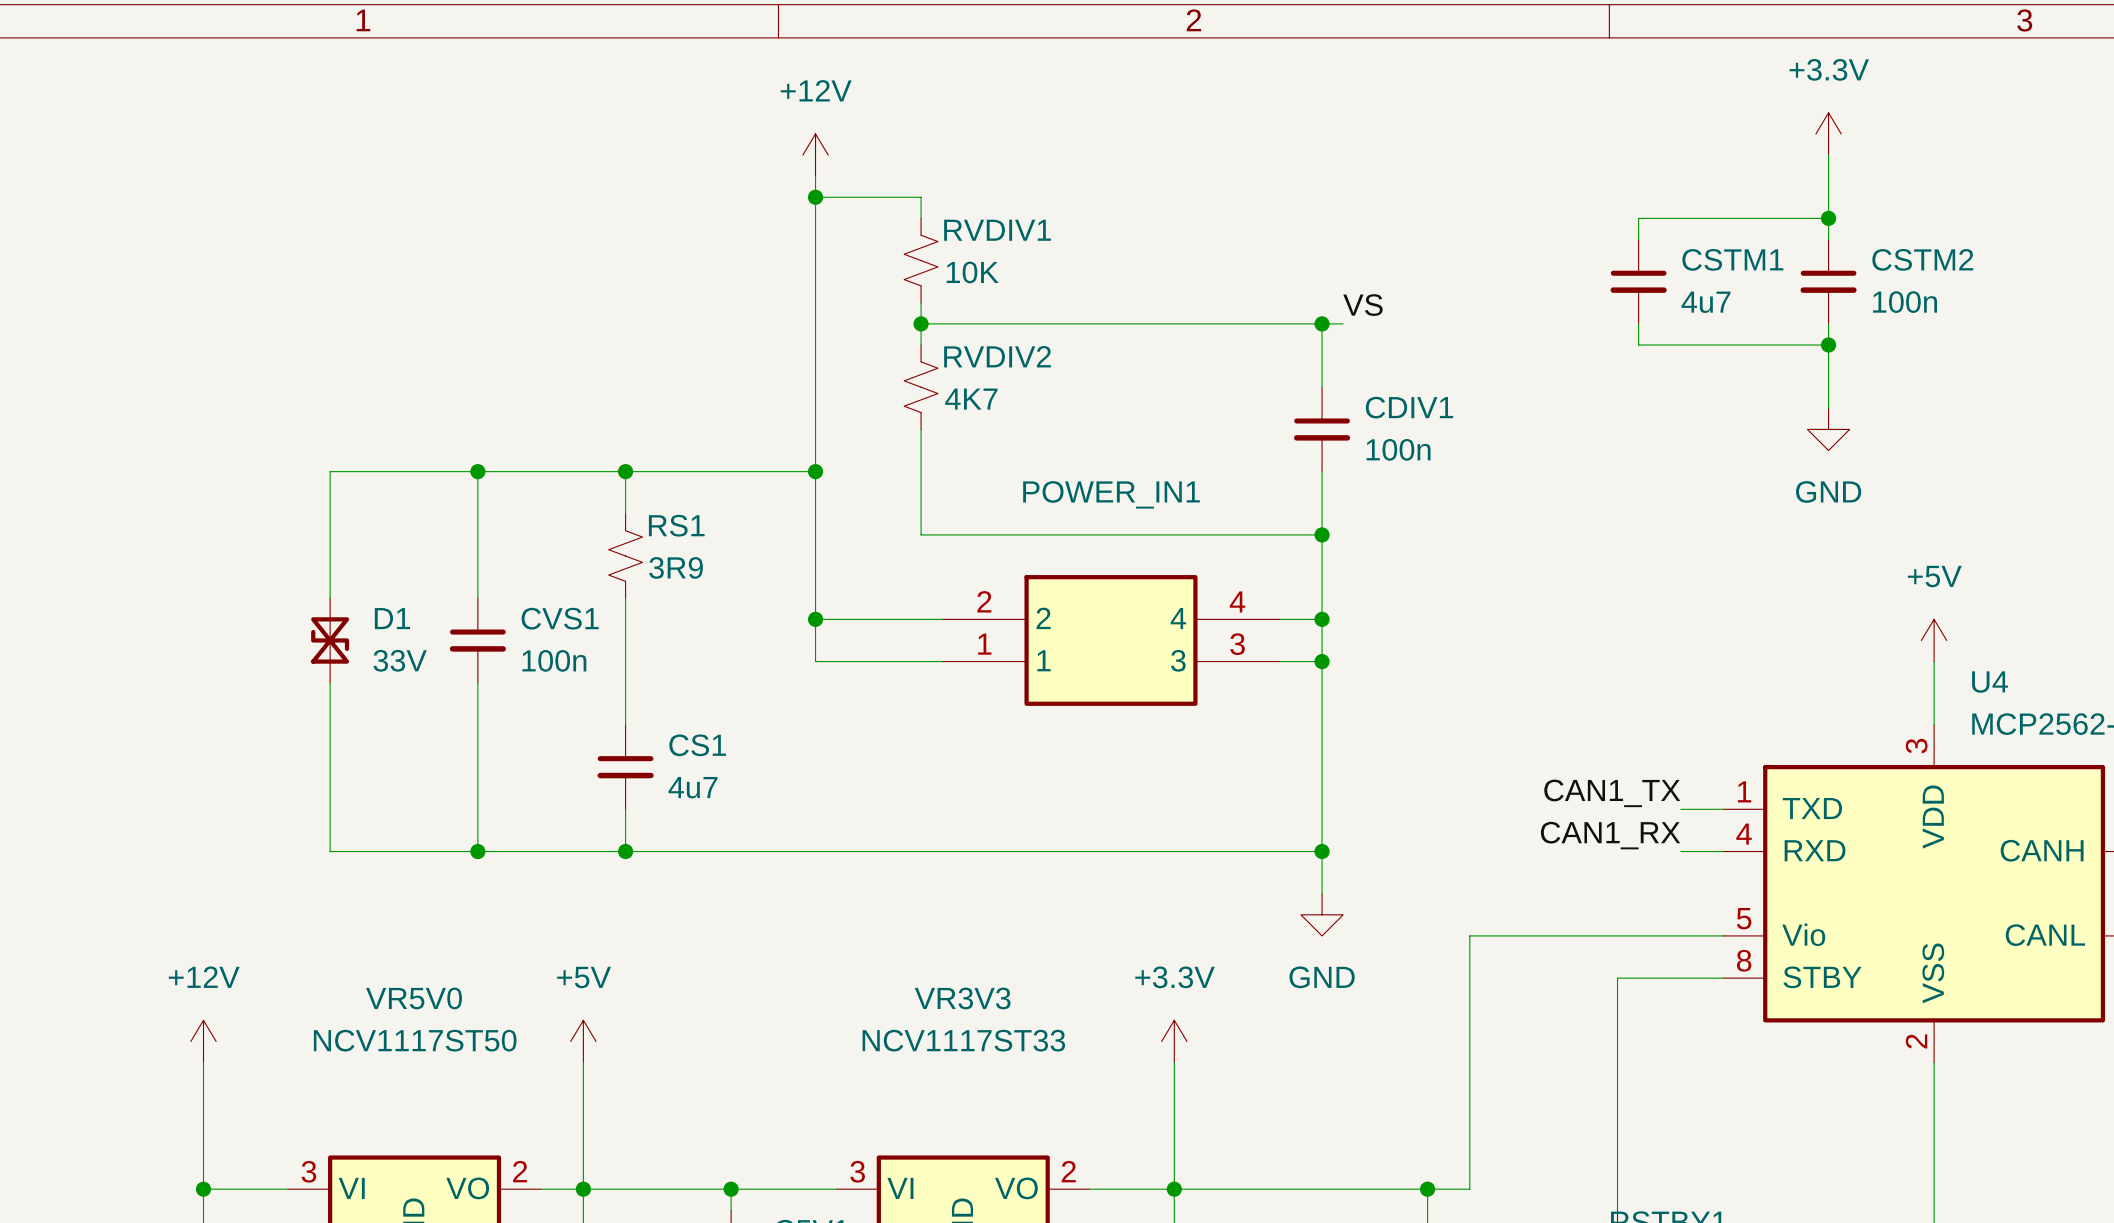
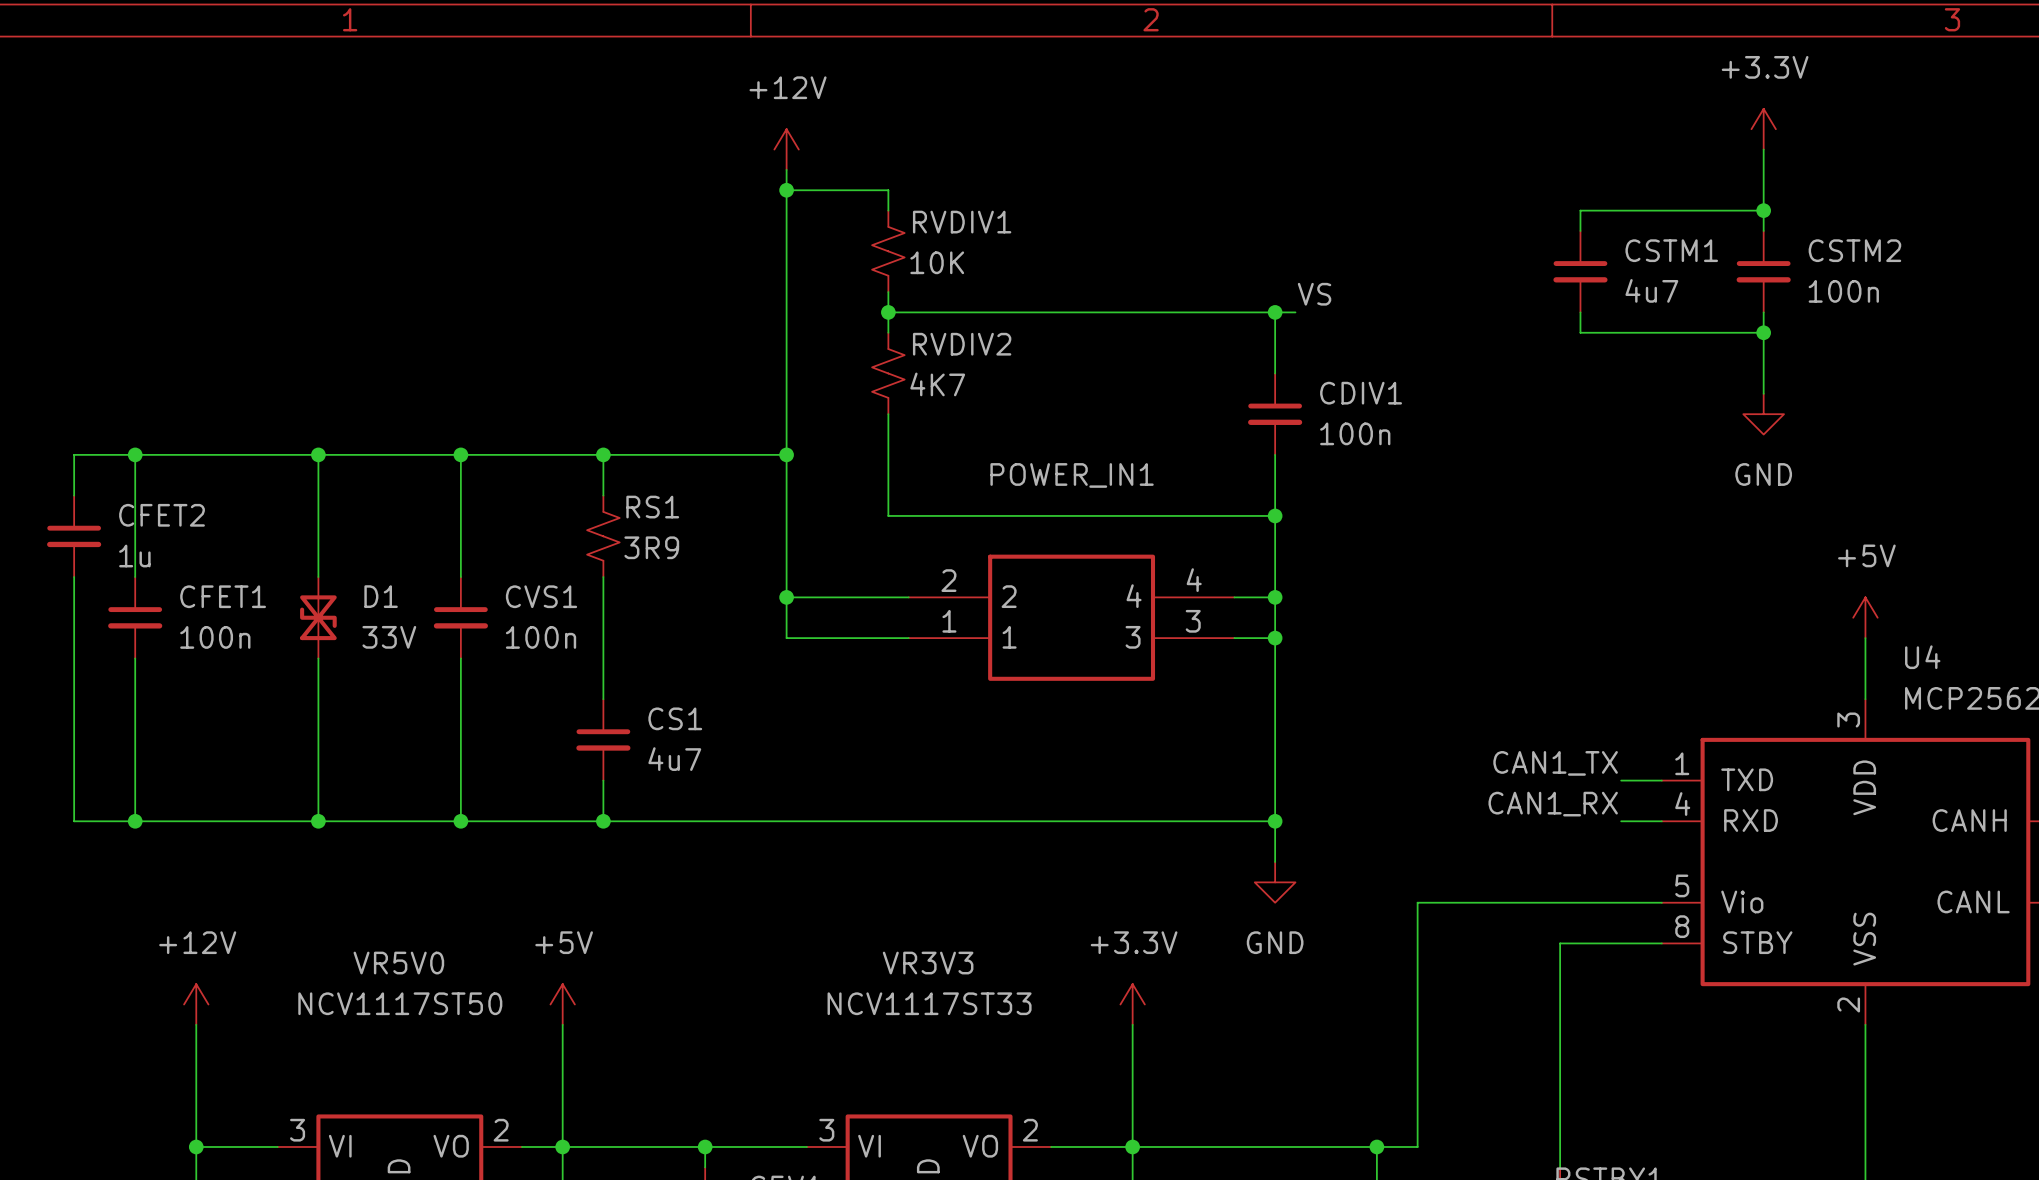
wire: none -> (135, 454) (135, 577)
junction: none -> (135, 454)
wire: none -> (318, 454) (74, 454) (74, 495)
junction: none -> (318, 454)
CFET2: none -> 1u (74, 536)
wire: none -> (74, 577) (74, 821) (318, 821)
CFET1: none -> 100n (135, 617)
wire: none -> (135, 658) (135, 821)
junction: none -> (135, 821)
junction: none -> (318, 821)

